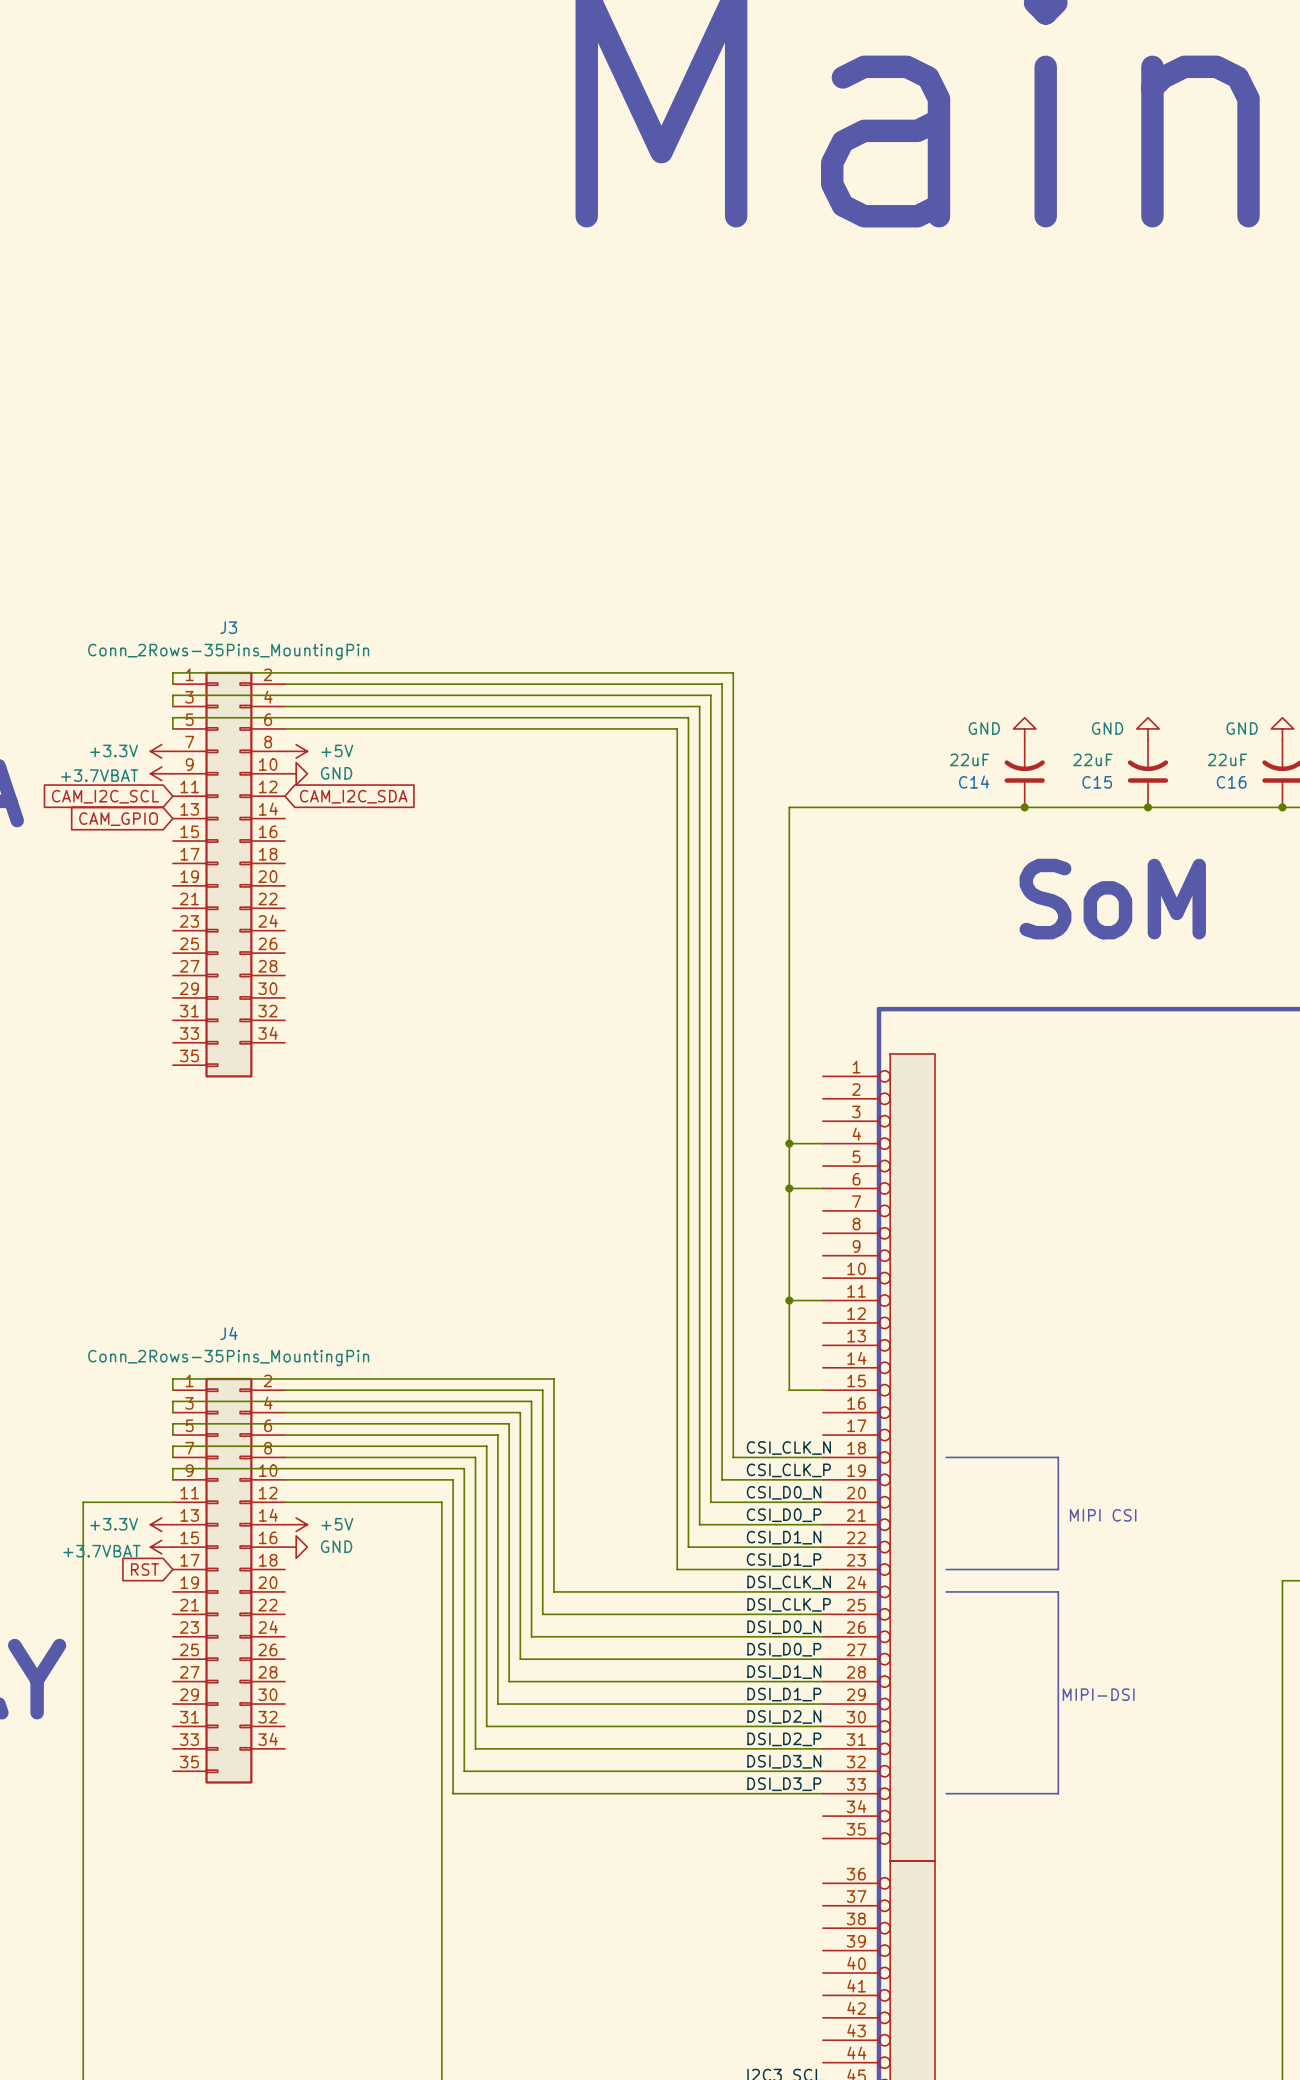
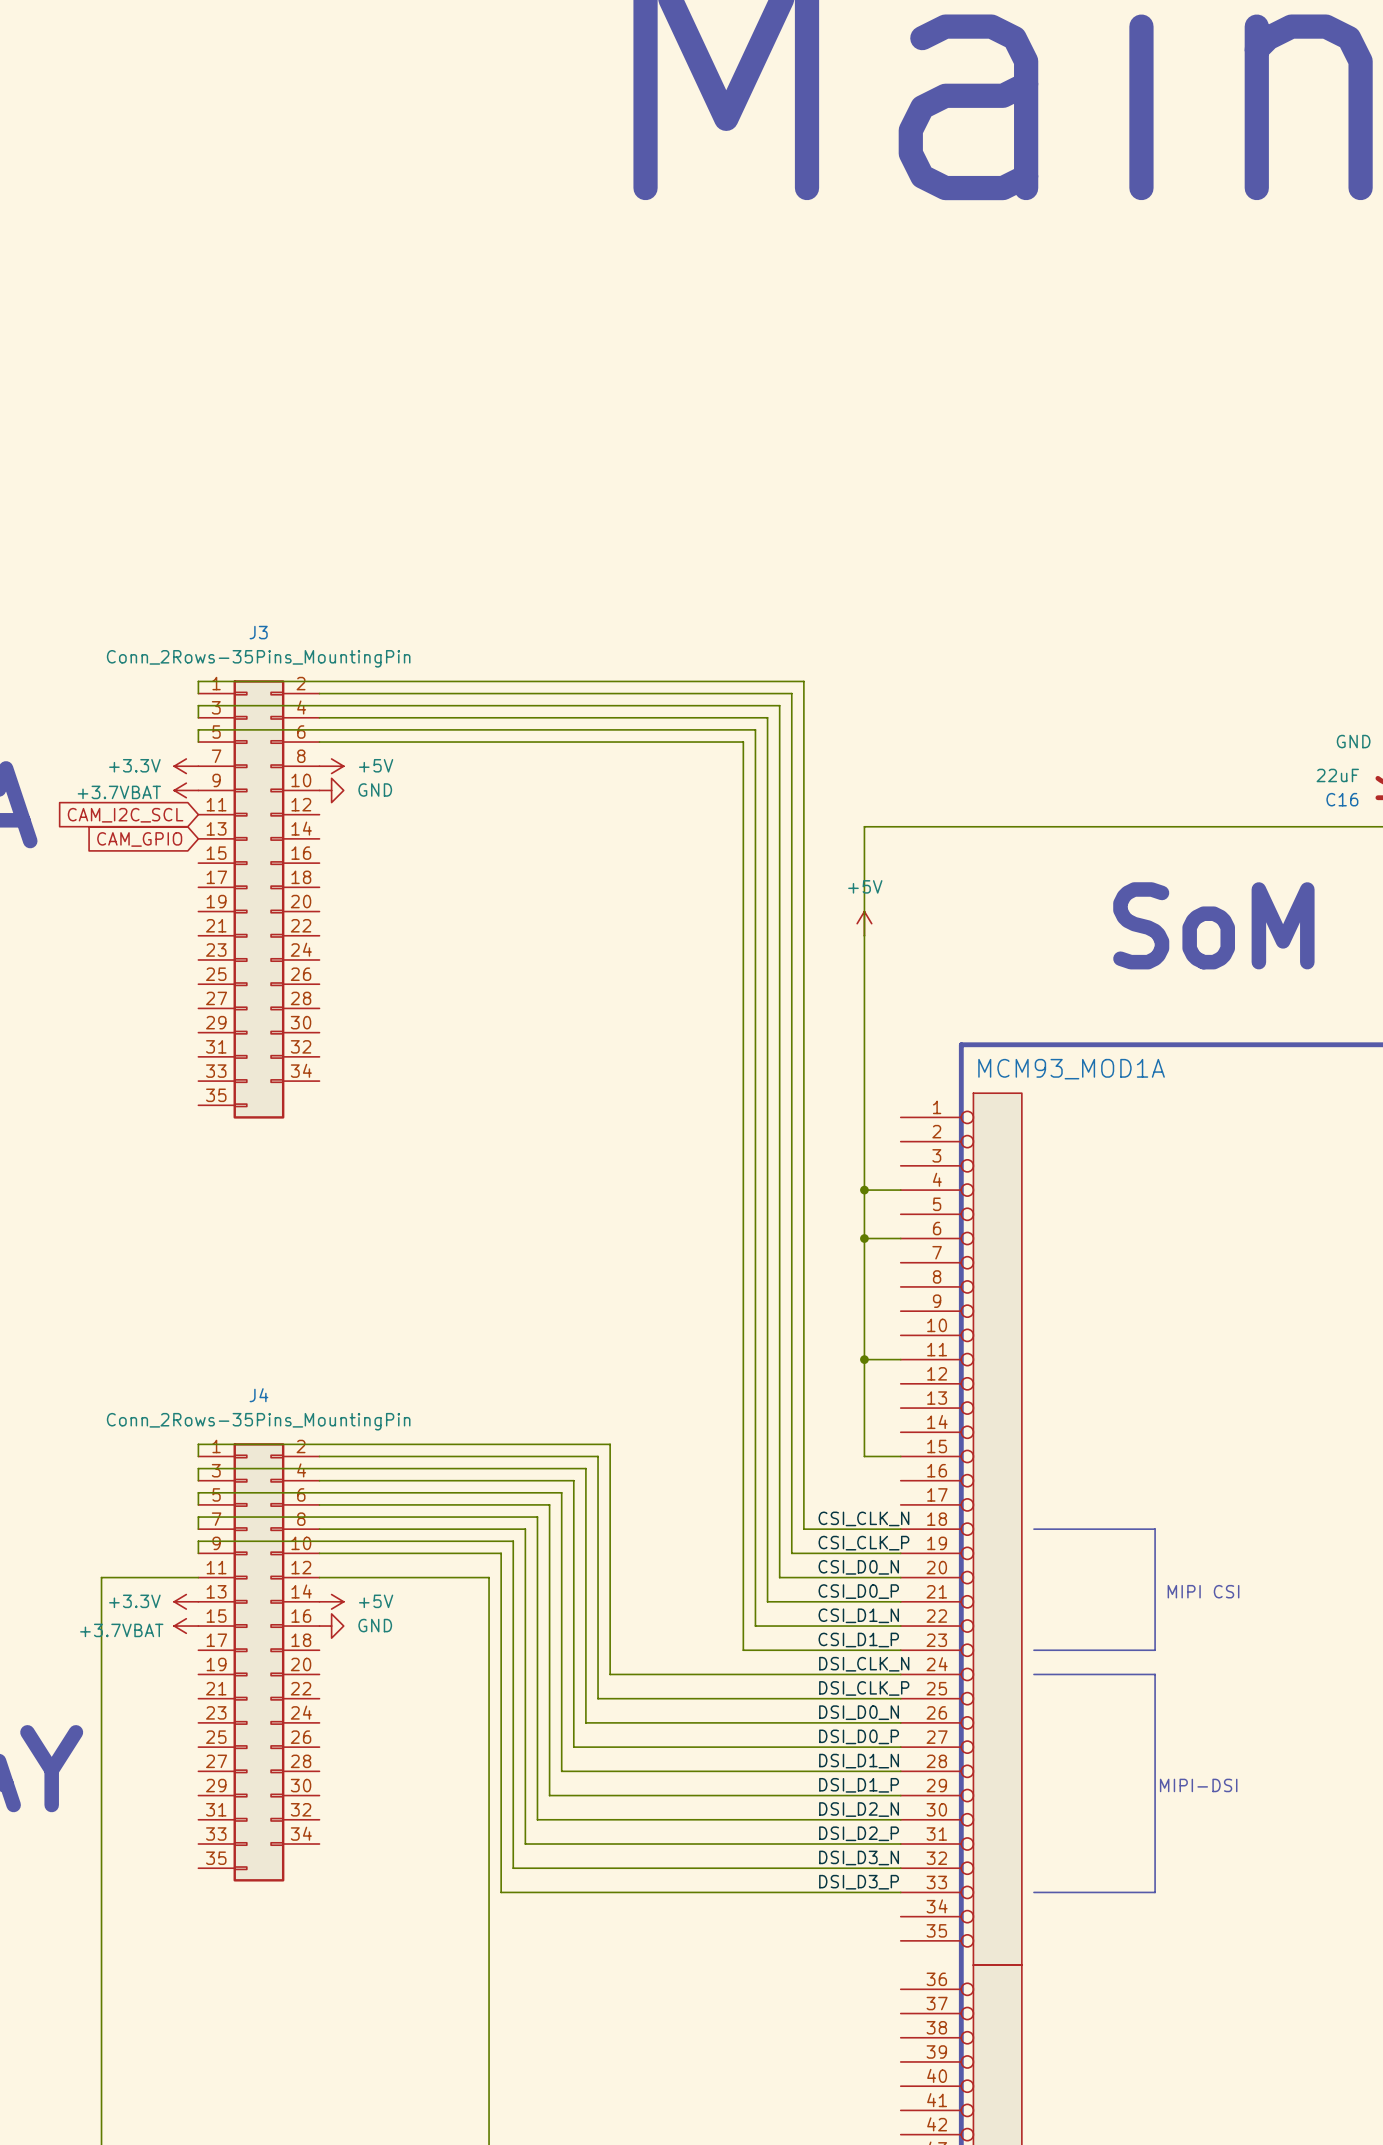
power symbol: GND (1024, 728) -> none
power symbol: GND (1147, 728) -> none
C14: 22uF (1024, 773) -> none
C15: 22uF (1147, 773) -> none
global label: CAM_I2C_SDA (353, 796) -> none
junction: (1024, 807) -> none
junction: (1147, 807) -> none
power symbol: none -> +5V (864, 923)
MCM93_MOD1A name: none -> MCM93_MOD1A (1071, 1069)
global label: RST (144, 1569) -> none

